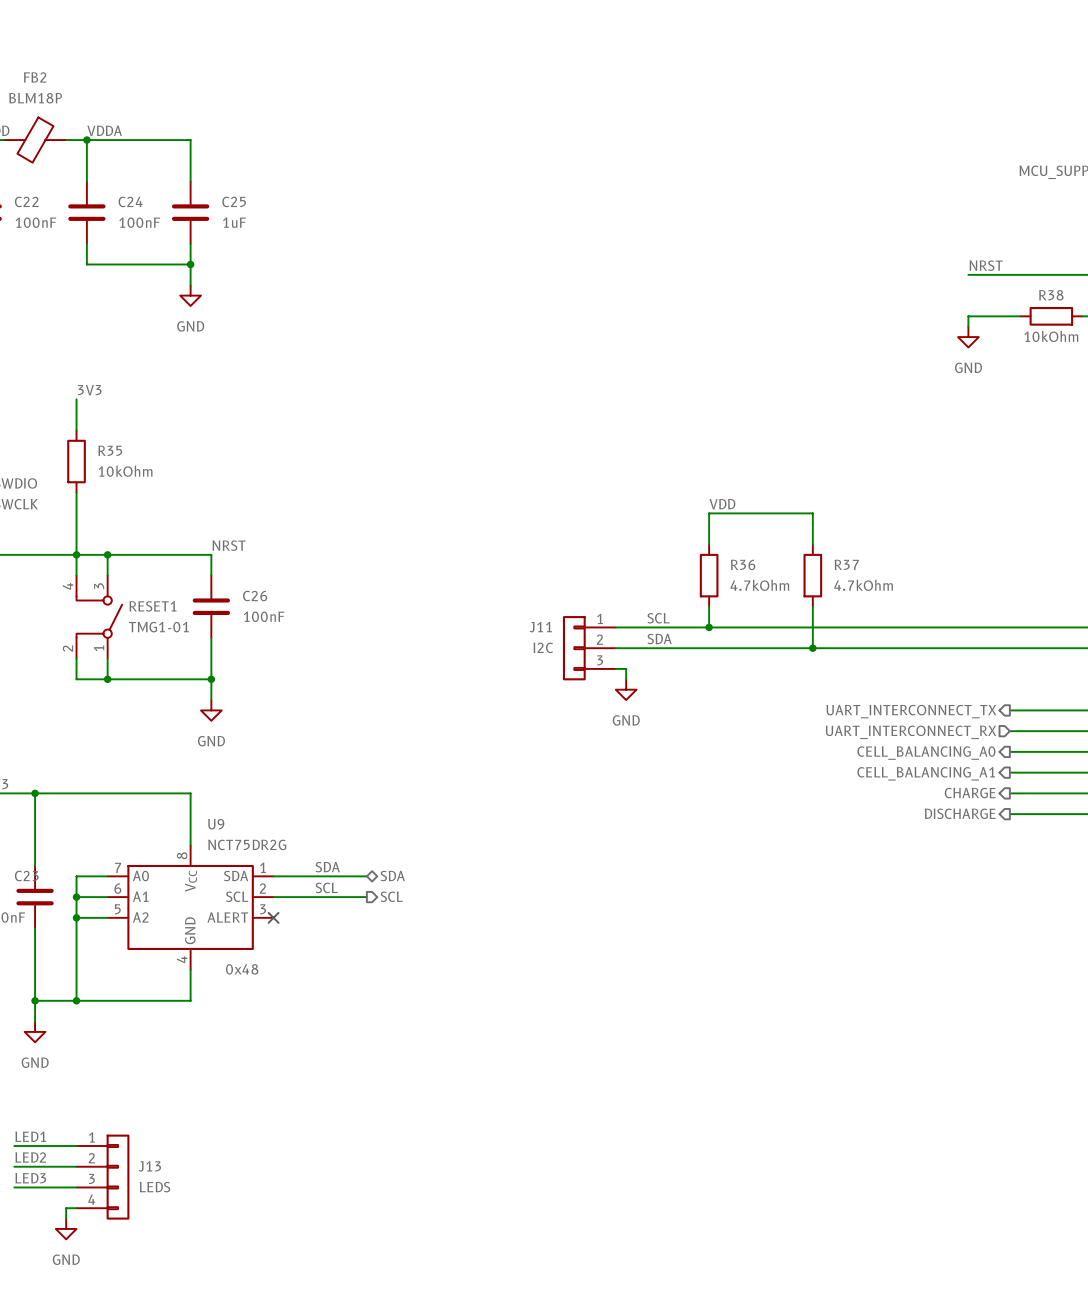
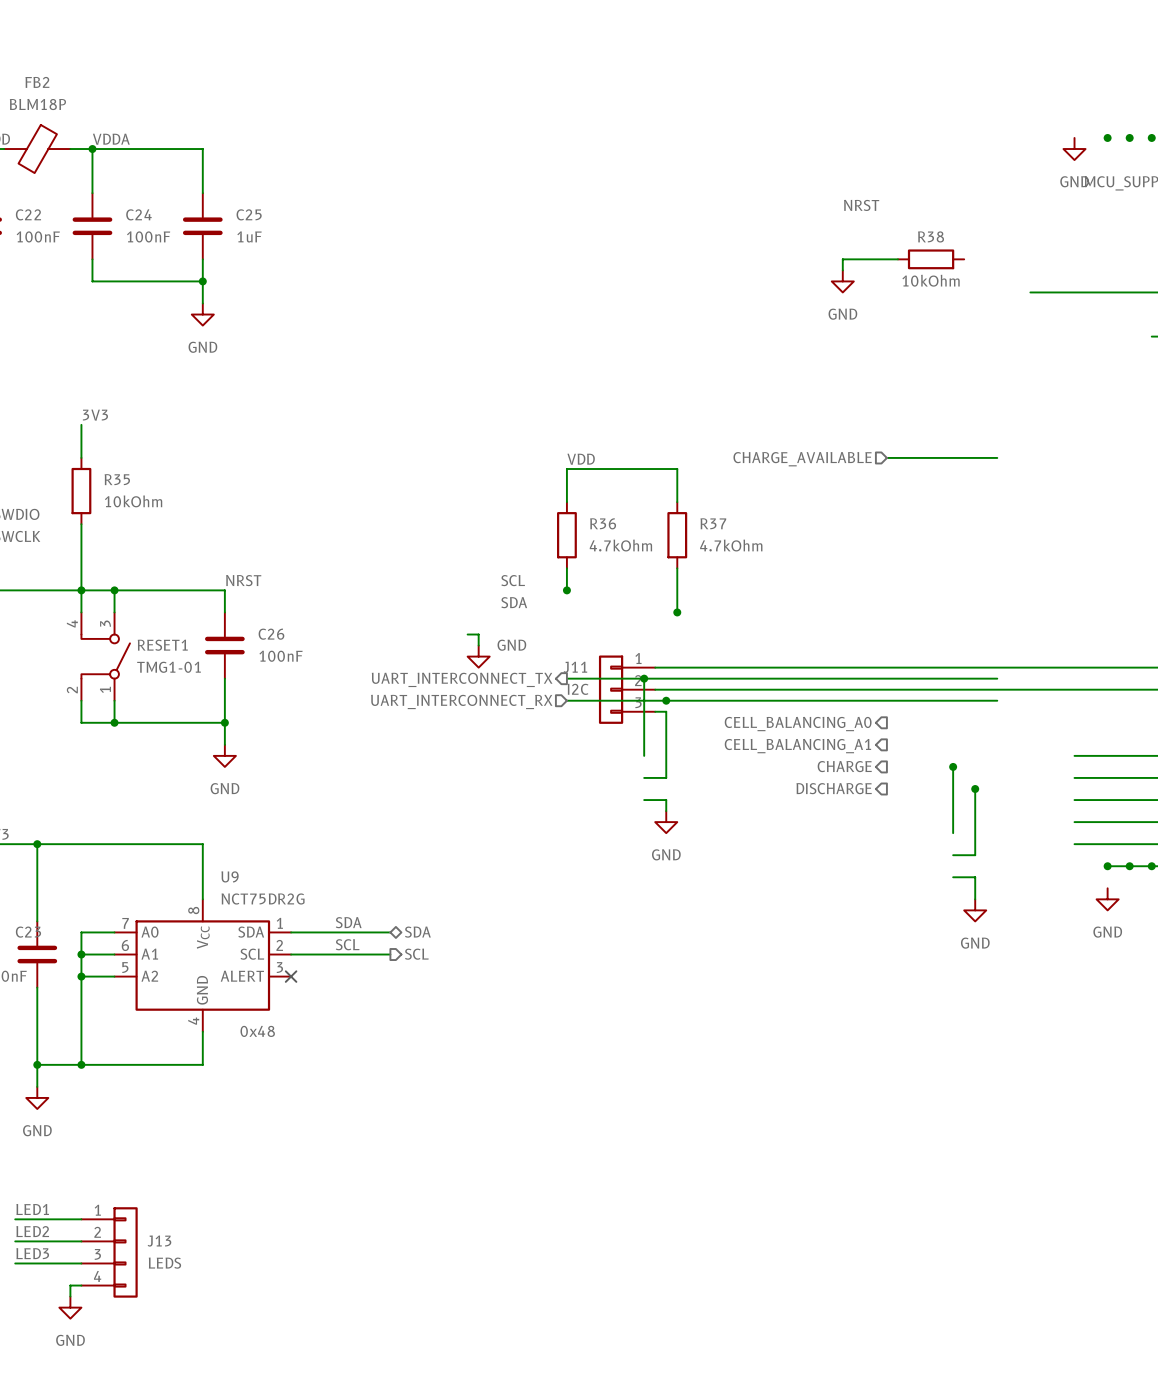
junction: none -> (1107, 137)
junction: none -> (1129, 137)
junction: none -> (1151, 137)
power symbol: none -> GND (1074, 149)
power symbol: none -> GND (842, 281)
label position: NRST (986, 265) -> NRST (861, 205)
wire: (1020, 316) (968, 316) (968, 326) -> (897, 259) (842, 259) (842, 270)
R38 position: (1051, 316) -> (931, 259)
power symbol: GND (968, 337) -> none
wire: none -> (886, 457) (997, 457)
hierarchical label: none -> CHARGE_AVAILABLE (802, 459)
label position: VDD (722, 504) -> VDD (581, 459)
wire: (709, 544) (709, 513) (812, 513) (812, 544) -> (566, 502) (566, 469) (677, 469) (677, 502)
junction: none -> (566, 590)
junction: none -> (677, 612)
R36 position: (709, 575) -> (566, 535)
R37 position: (812, 575) -> (677, 535)
wire: none -> (467, 634) (478, 634) (478, 645)
wire: (709, 606) (709, 627) -> (566, 568) (566, 590)
wire: (812, 606) (812, 648) -> (677, 568) (677, 612)
power symbol: none -> GND (478, 656)
label position: SCL (658, 618) -> SCL (513, 580)
junction: (709, 627) -> none
wire: none -> (566, 678) (997, 678)
wire: none -> (644, 678) (644, 755)
junction: none -> (644, 678)
hierarchical label: none -> UART_INTERCONNECT_TX (462, 679)
label position: SDA (659, 639) -> SDA (514, 602)
junction: (812, 648) -> none
wire: none -> (566, 700) (997, 700)
junction: none -> (666, 700)
hierarchical label: none -> UART_INTERCONNECT_RX (461, 701)
wire: none -> (666, 722) (666, 777) (644, 777)
power symbol position: GND (626, 689) -> GND (666, 822)
hierarchical label: UART_INTERCONNECT_TX (911, 711) -> none
wire: none -> (953, 766) (953, 833)
junction: none -> (953, 766)
hierarchical label: UART_INTERCONNECT_RX (911, 732) -> none
wire: none -> (975, 789) (975, 855) (953, 855)
junction: none -> (975, 789)
wire: none -> (644, 800) (666, 800) (666, 811)
hierarchical label position: CELL_BALANCING_A0 (926, 753) -> CELL_BALANCING_A0 (798, 724)
hierarchical label position: CELL_BALANCING_A1 (926, 773) -> CELL_BALANCING_A1 (797, 746)
hierarchical label position: CHARGE (970, 793) -> CHARGE (844, 766)
hierarchical label position: DISCHARGE (960, 813) -> DISCHARGE (834, 788)
wire: (1009, 814) (1040, 814) -> none
junction: none -> (1107, 866)
junction: none -> (1129, 866)
junction: none -> (1151, 866)
wire: none -> (953, 877) (975, 877) (975, 899)
power symbol: none -> GND (1107, 899)
power symbol: none -> GND (975, 910)

